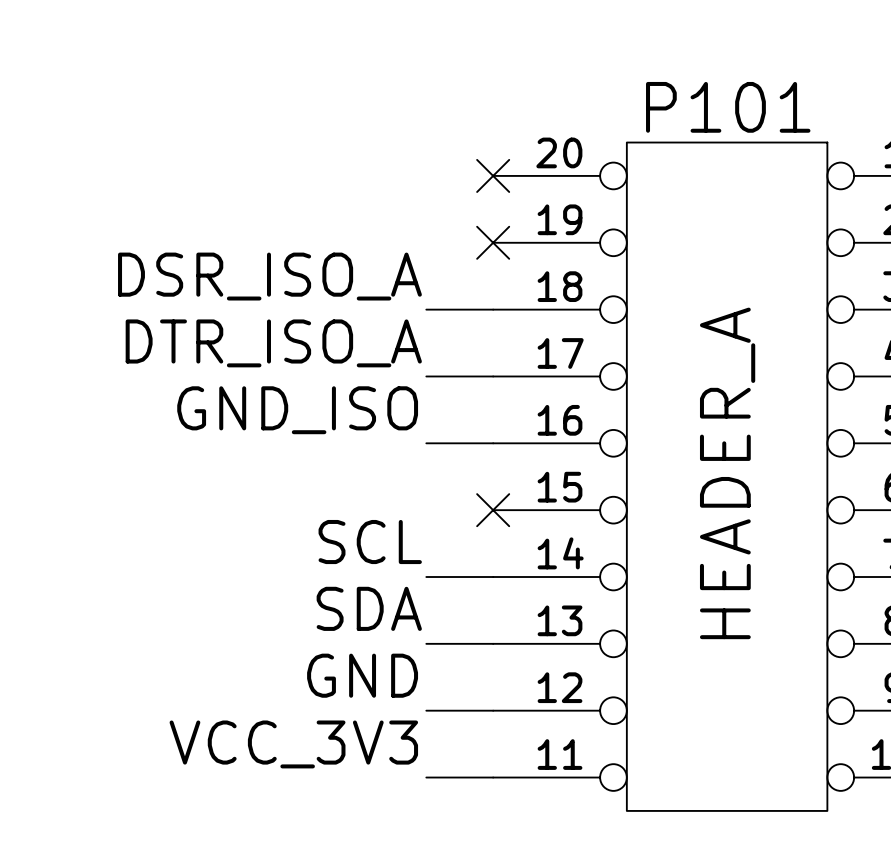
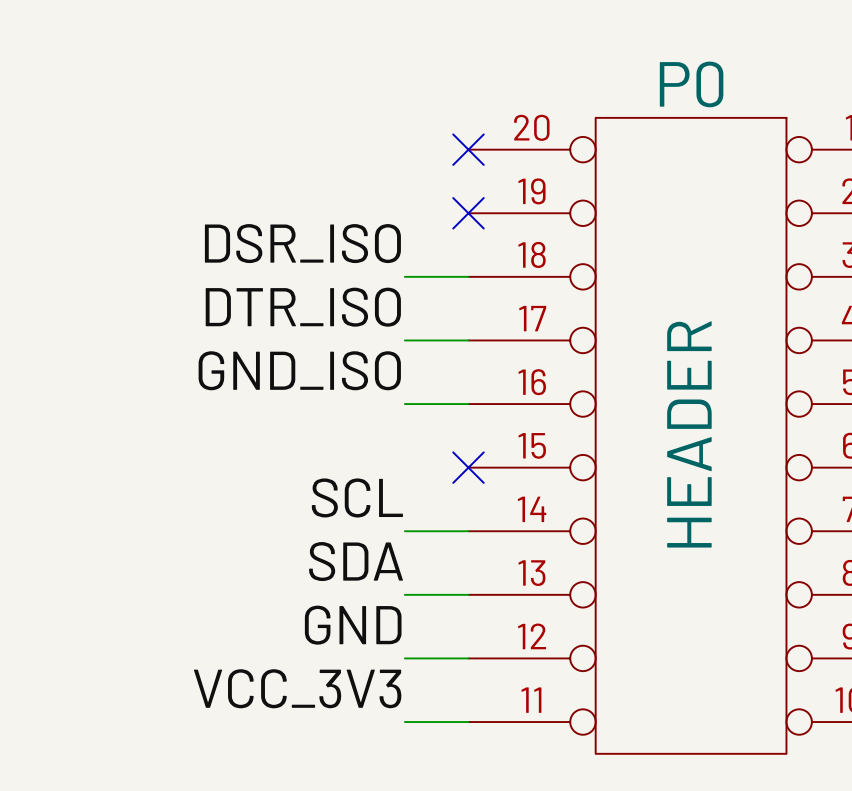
P101 name: P101 (728, 107) -> P0 (691, 84)
label: DSR_ISO_A (269, 276) -> DSR_ISO (302, 243)
label: DTR_ISO_A (273, 343) -> DTR_ISO (303, 307)
P101 value: HEADER_A (727, 473) -> HEADER (689, 434)

